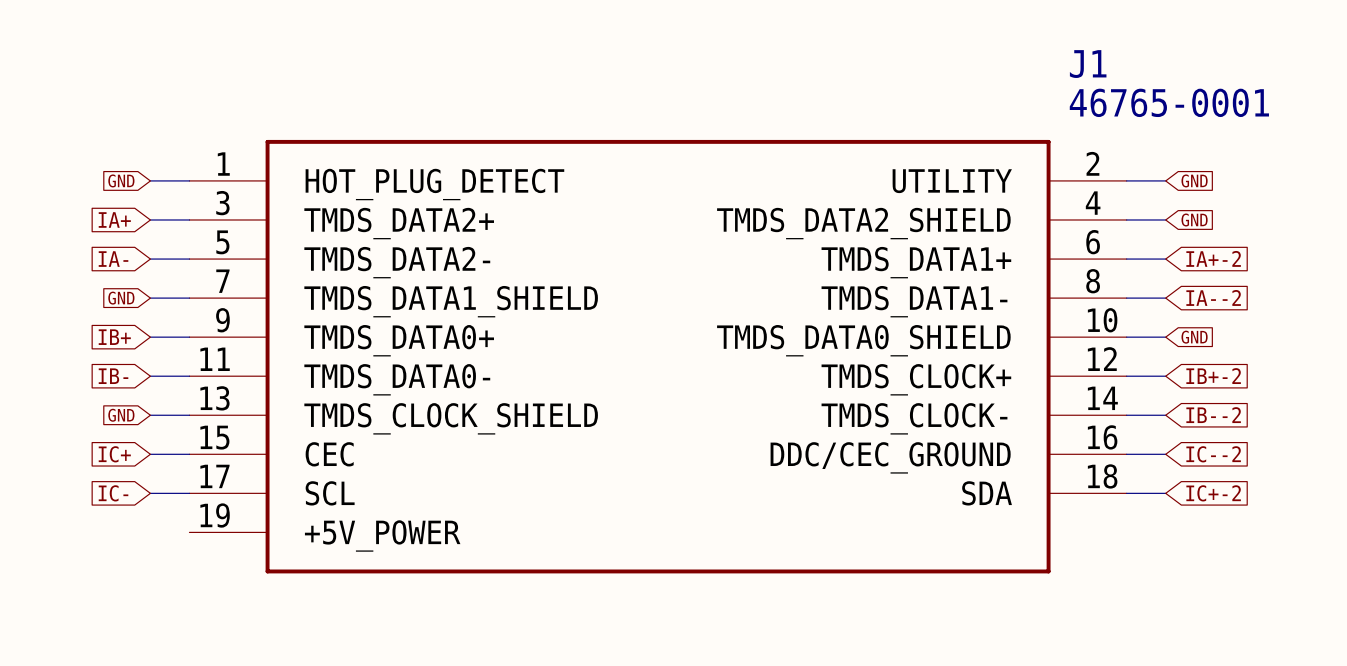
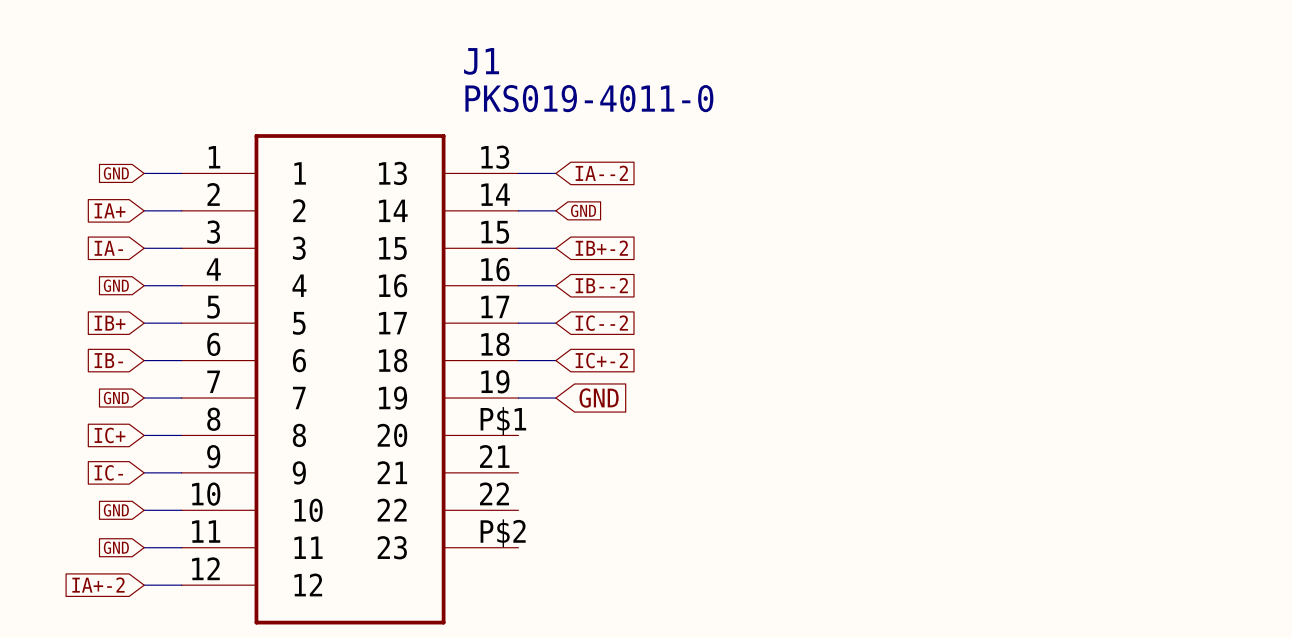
J1 name position: J1 (1088, 64) -> J1 (481, 61)
J1 value: 46765-0001 (1169, 102) -> PKS019-4011-0 (589, 98)
J1 symbol: [189, 139, 1127, 574] -> [181, 134, 519, 625]
wire: none -> (518, 173) (555, 173)
global label: none -> IA--2 (601, 173)
wire: (1126, 180) (1165, 180) -> none
global label: GND (1194, 180) -> none
wire: none -> (518, 210) (555, 210)
wire: (1126, 219) (1165, 219) -> none
global label: none -> GND (583, 210)
global label: GND (1194, 220) -> none
global label: none -> IB+-2 (601, 248)
global label: IA+-2 (1213, 258) -> none
wire: none -> (518, 248) (555, 248)
wire: (1126, 259) (1165, 259) -> none
global label: none -> IB--2 (601, 285)
global label: IA--2 (1213, 297) -> none
wire: none -> (518, 285) (555, 285)
wire: (1126, 298) (1165, 298) -> none
wire: none -> (518, 323) (555, 323)
global label: none -> IC--2 (601, 323)
wire: (1126, 337) (1165, 337) -> none
global label: GND (1194, 337) -> none
wire: none -> (518, 360) (555, 360)
global label: none -> IC+-2 (601, 360)
wire: (1126, 376) (1165, 376) -> none
global label: IB+-2 (1213, 376) -> none
wire: none -> (518, 398) (555, 398)
global label: none -> GND (599, 398)
wire: (1126, 415) (1165, 415) -> none
global label: IB--2 (1213, 415) -> none
wire: (1126, 454) (1165, 454) -> none
global label: IC--2 (1213, 454) -> none
wire: (1126, 493) (1165, 493) -> none
global label: IC+-2 (1213, 493) -> none
global label: none -> GND (116, 510)
wire: none -> (144, 510) (181, 510)
global label: none -> GND (116, 547)
wire: none -> (144, 547) (181, 547)
global label: none -> IA+-2 (98, 585)
wire: none -> (144, 585) (181, 585)

